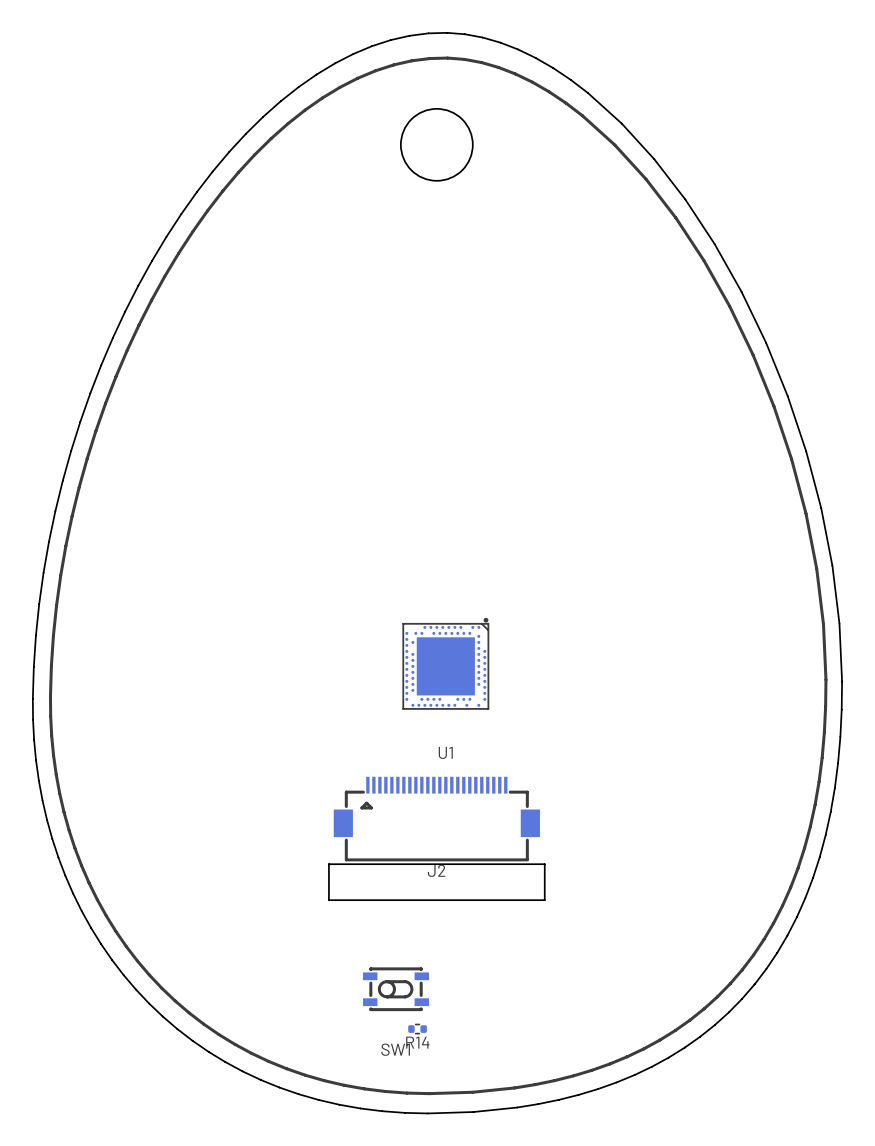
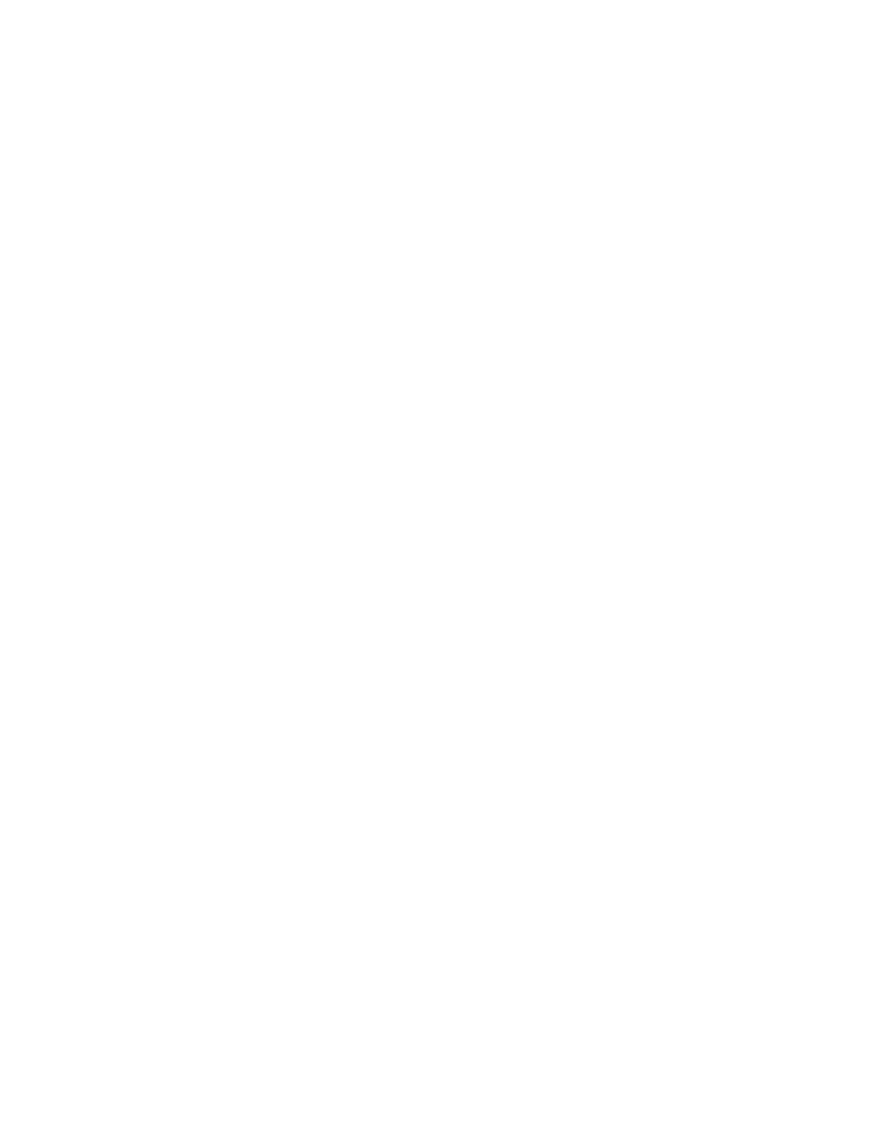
board edge: (447, 32) (482, 37) (518, 49) (553, 68) (587, 93) (621, 123) (654, 159) (685, 199) (714, 243) (741, 291) (766, 342) (787, 396) (806, 451) (821, 508) (832, 565) (839, 623) (841, 709) (834, 787) (825, 835) (812, 878) (796, 917) (777, 952) (754, 984) (728, 1012) (700, 1036) (668, 1057) (634, 1075) (597, 1089) (558, 1099) (517, 1107) (473, 1112) (404, 1112) (360, 1108) (318, 1099) (279, 1087) (242, 1071) (208, 1051) (177, 1029) (149, 1003) (123, 975) (101, 944) (81, 910) (65, 875) (52, 838) (42, 800) (36, 760) (33, 719) (33, 667) (43, 572) (55, 511) (71, 451) (90, 393) (112, 337) (138, 285) (166, 236) (196, 192) (229, 152) (263, 116) (298, 87) (334, 63) (372, 46) (409, 35) (447, 32) -> none
line: (447, 58) (481, 62) (515, 73) (549, 91) (582, 115) (614, 145) (646, 179) (675, 217) (703, 260) (729, 306) (753, 355) (773, 406) (791, 459) (806, 513) (816, 568) (823, 624) (825, 706) (819, 781) (810, 826) (798, 868) (782, 905) (763, 939) (742, 969) (717, 996) (690, 1020) (659, 1040) (627, 1056) (591, 1070) (554, 1080) (514, 1087) (472, 1092) (406, 1093) (364, 1088) (324, 1080) (286, 1068) (251, 1053) (218, 1034) (189, 1012) (161, 988) (137, 960) (115, 931) (97, 899) (81, 865) (69, 830) (59, 793) (53, 755) (50, 716) (51, 665) (60, 575) (72, 516) (87, 458) (105, 403) (127, 350) (151, 300) (178, 253) (207, 210) (238, 172) (271, 138) (305, 110) (340, 87) (375, 70) (411, 60) (447, 58) -> none
round board edge: [400, 108, 473, 181] -> none
U1: (445, 663) -> none
J2: (436, 819) -> none
board edge: (544, 864) (328, 864) (328, 900) (544, 900) (544, 864) -> none
SW1: (396, 989) -> none
R14: (417, 1029) -> none

